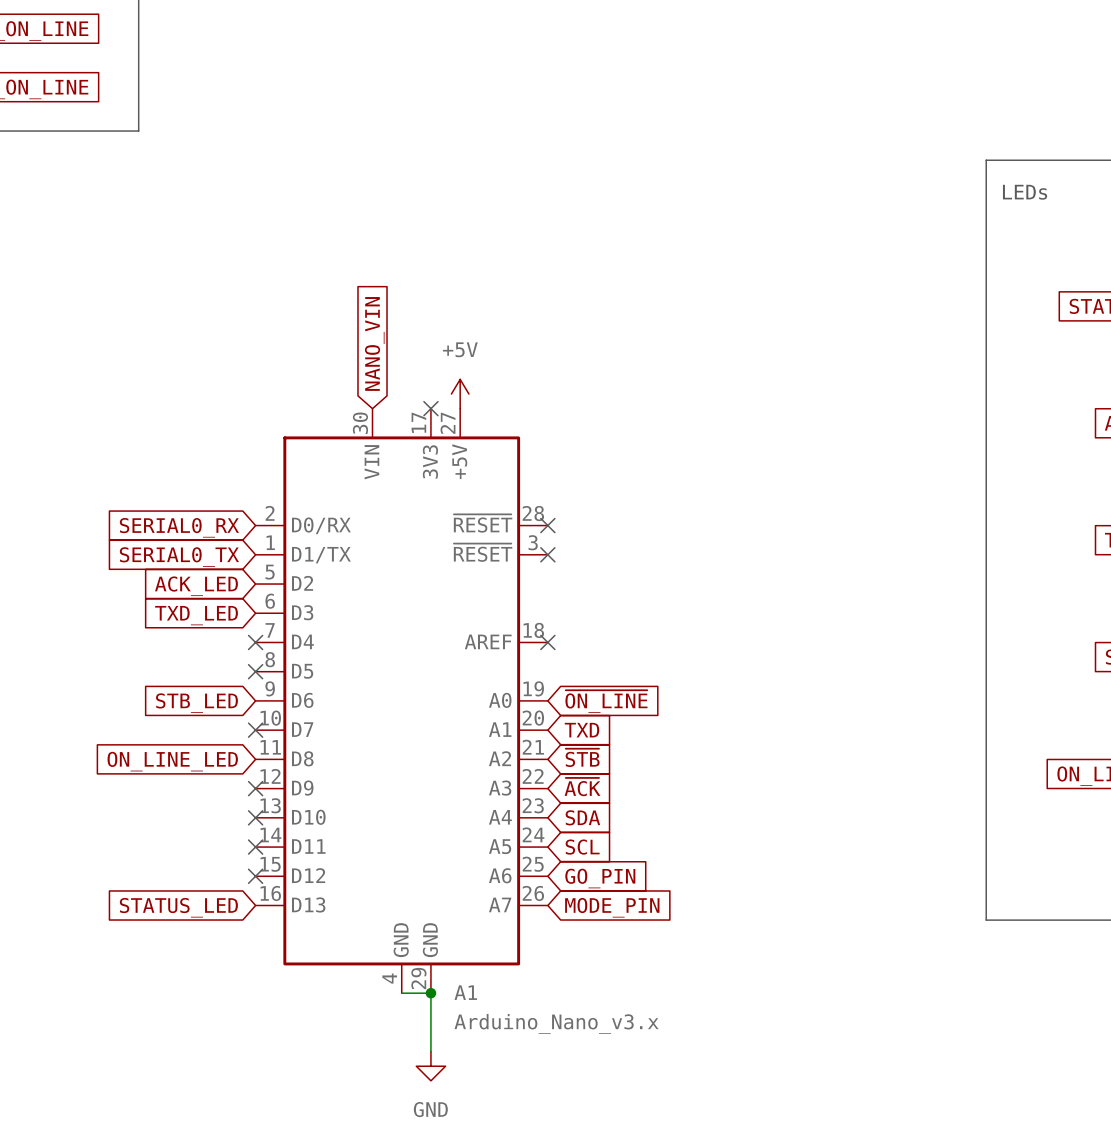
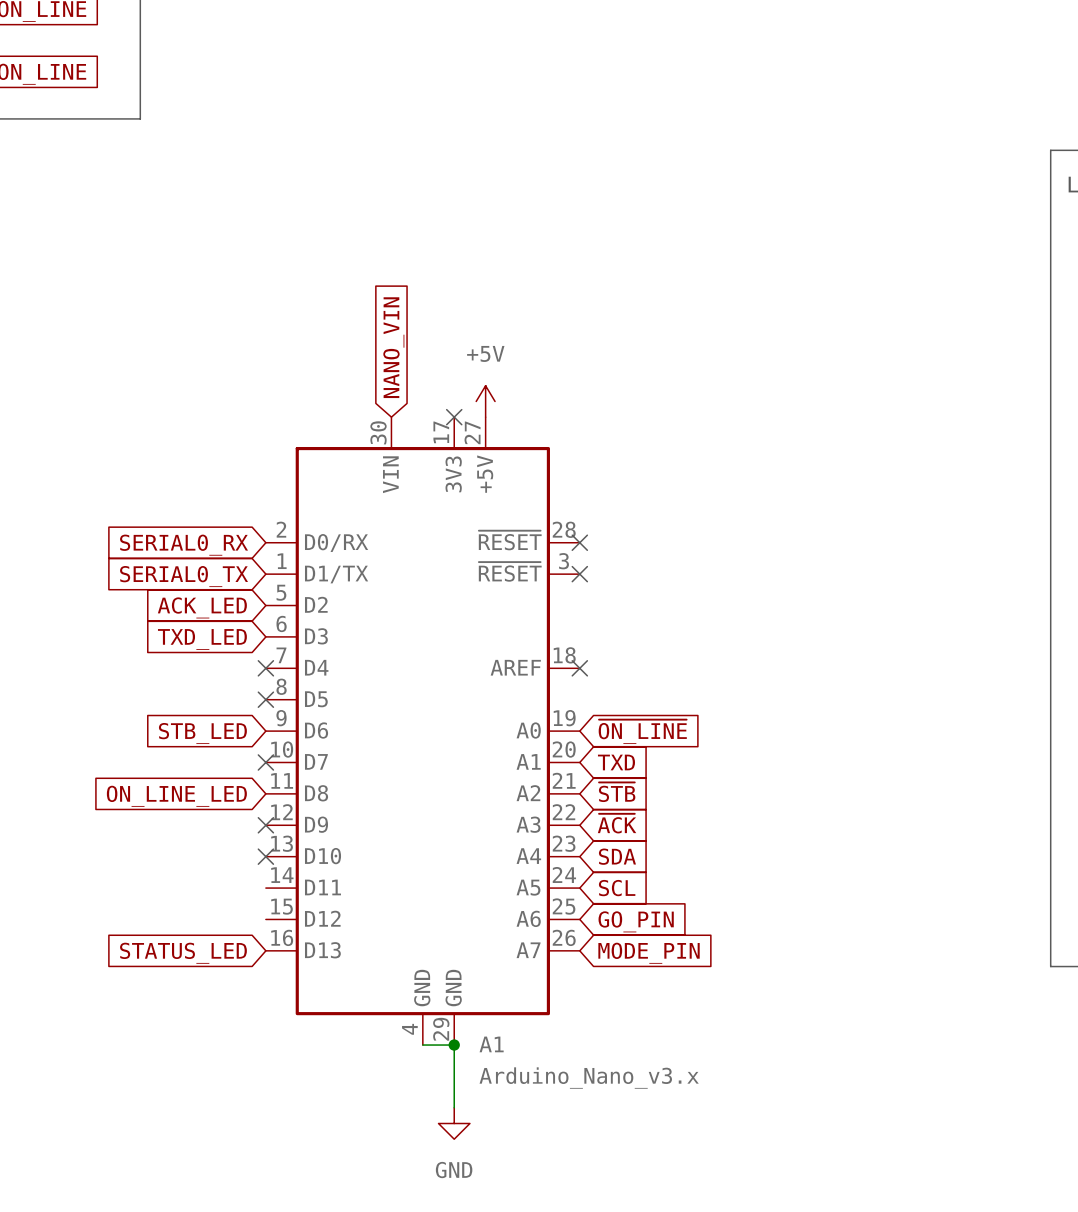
no-connect mark: (255, 847) -> none
no-connect mark: (255, 876) -> none

